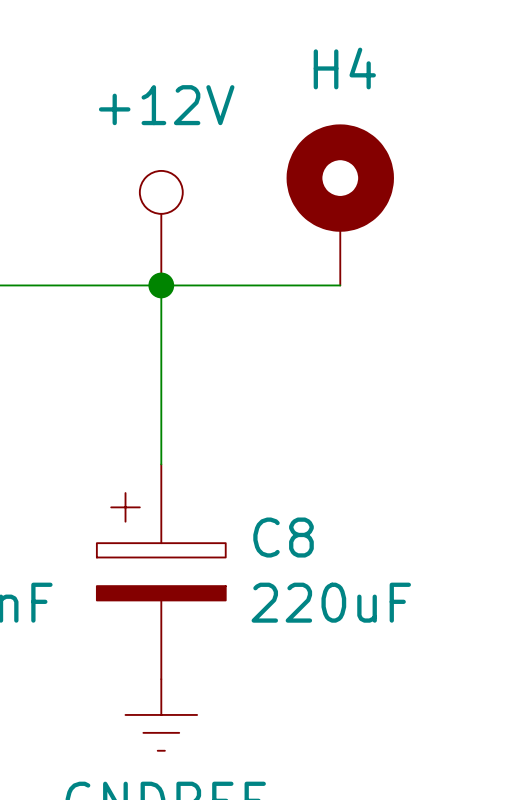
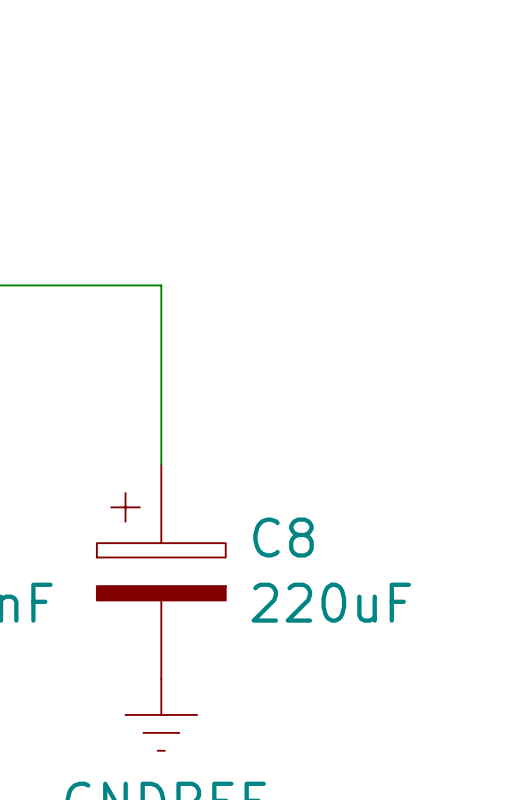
H4: (340, 204) -> none
part: +12V (161, 228) -> none
wire: (161, 285) (340, 285) -> none
junction: (161, 285) -> none

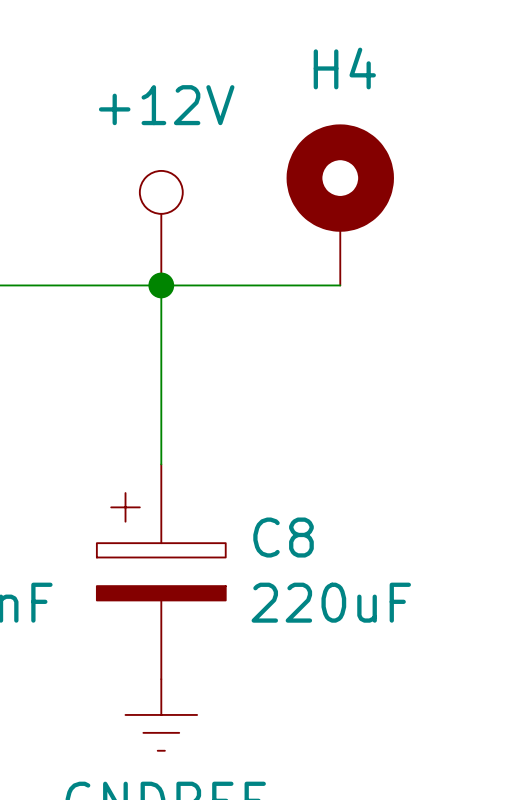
H4: none -> (340, 204)
part: none -> +12V (161, 228)
wire: none -> (161, 285) (340, 285)
junction: none -> (161, 285)

